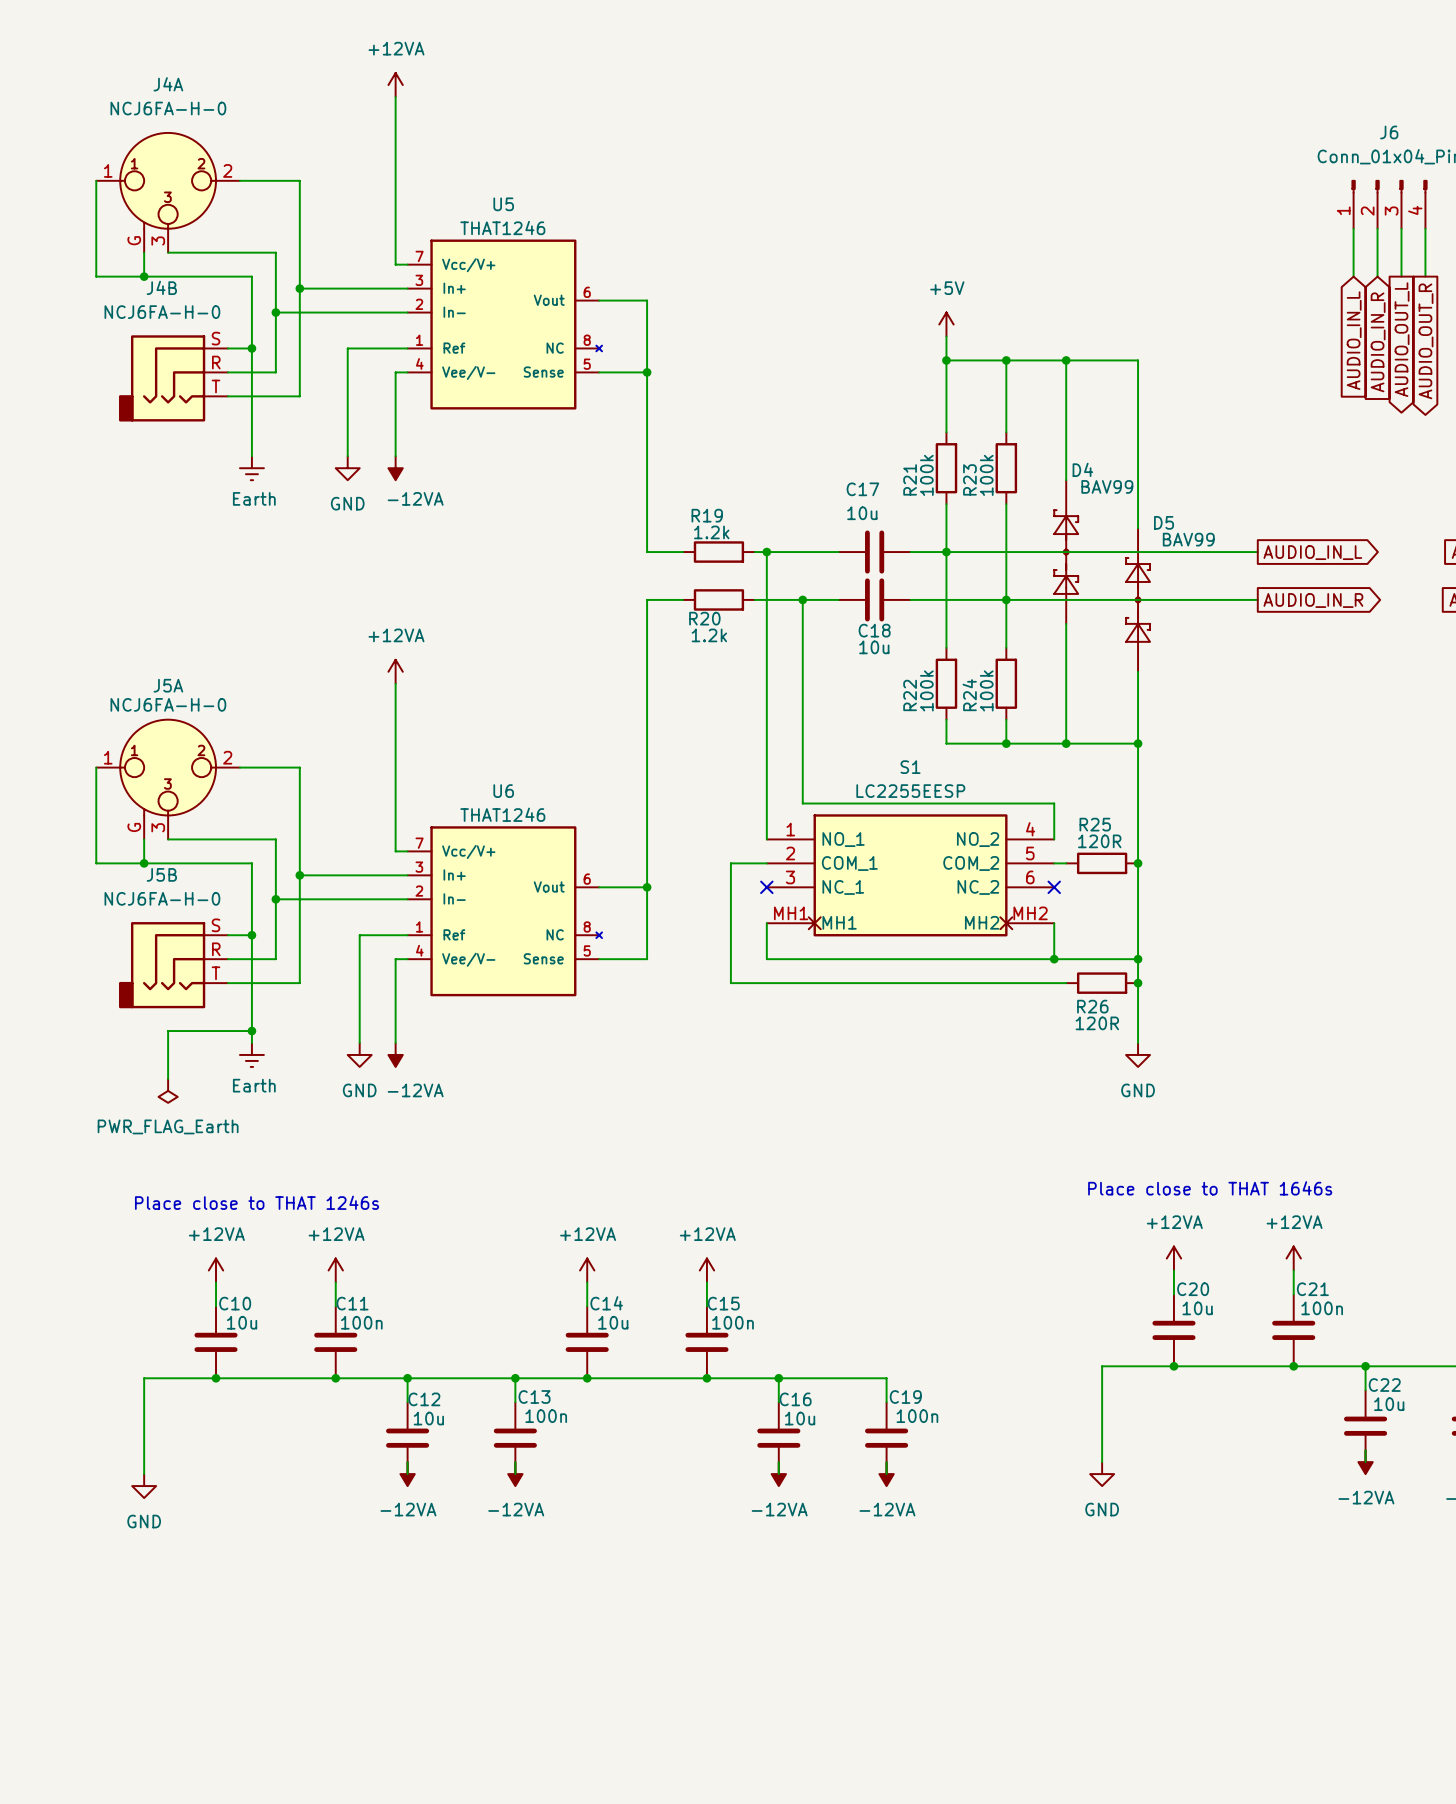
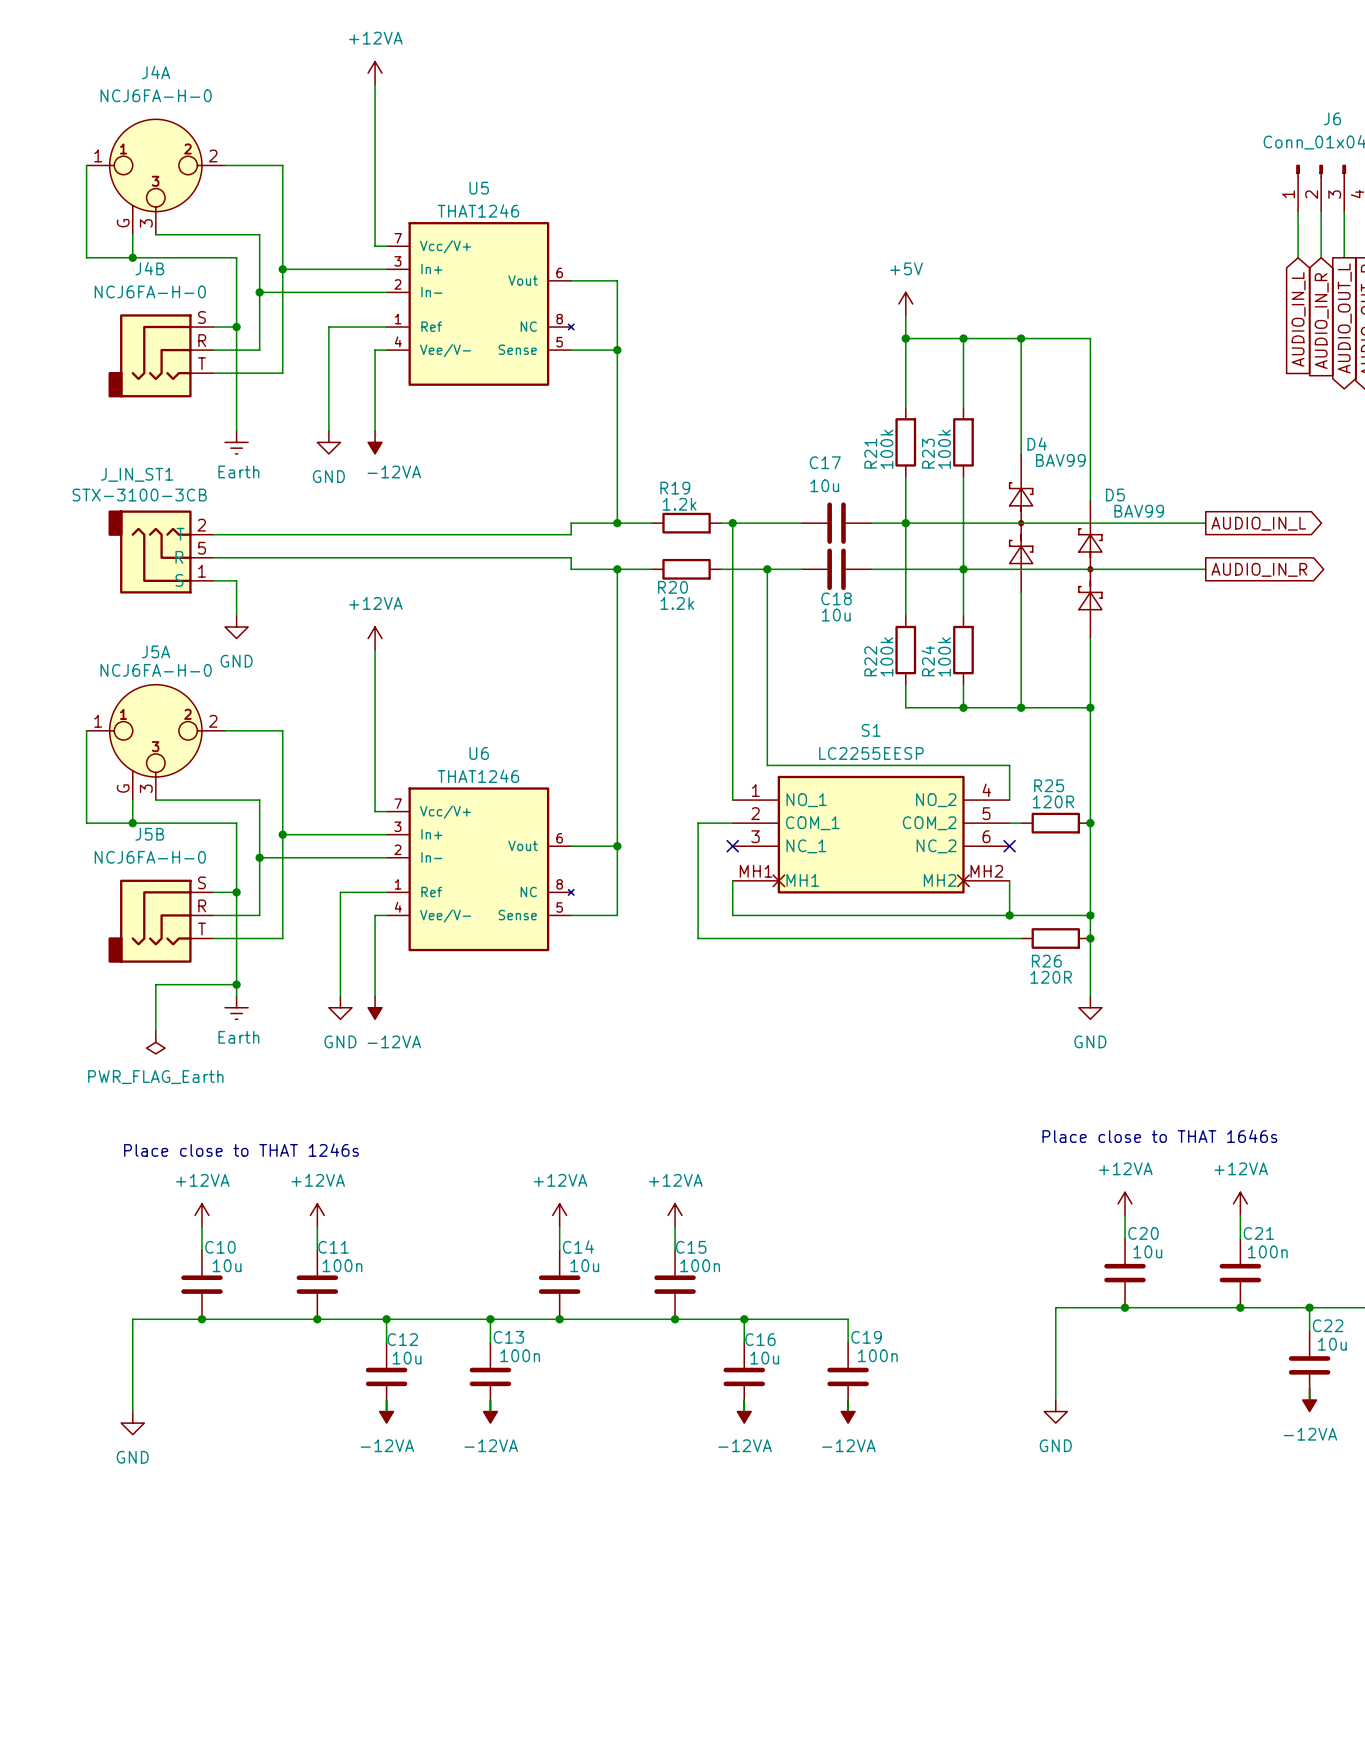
wire: none -> (617, 523) (571, 523) (571, 534) (213, 534)
junction: none -> (617, 523)
J_IN_ST1: none -> STX-3100-3CB (161, 552)
wire: none -> (213, 557) (571, 557) (571, 569) (617, 569)
junction: none -> (617, 569)
wire: none -> (213, 580) (236, 580) (236, 615)
power symbol: none -> GND (236, 626)

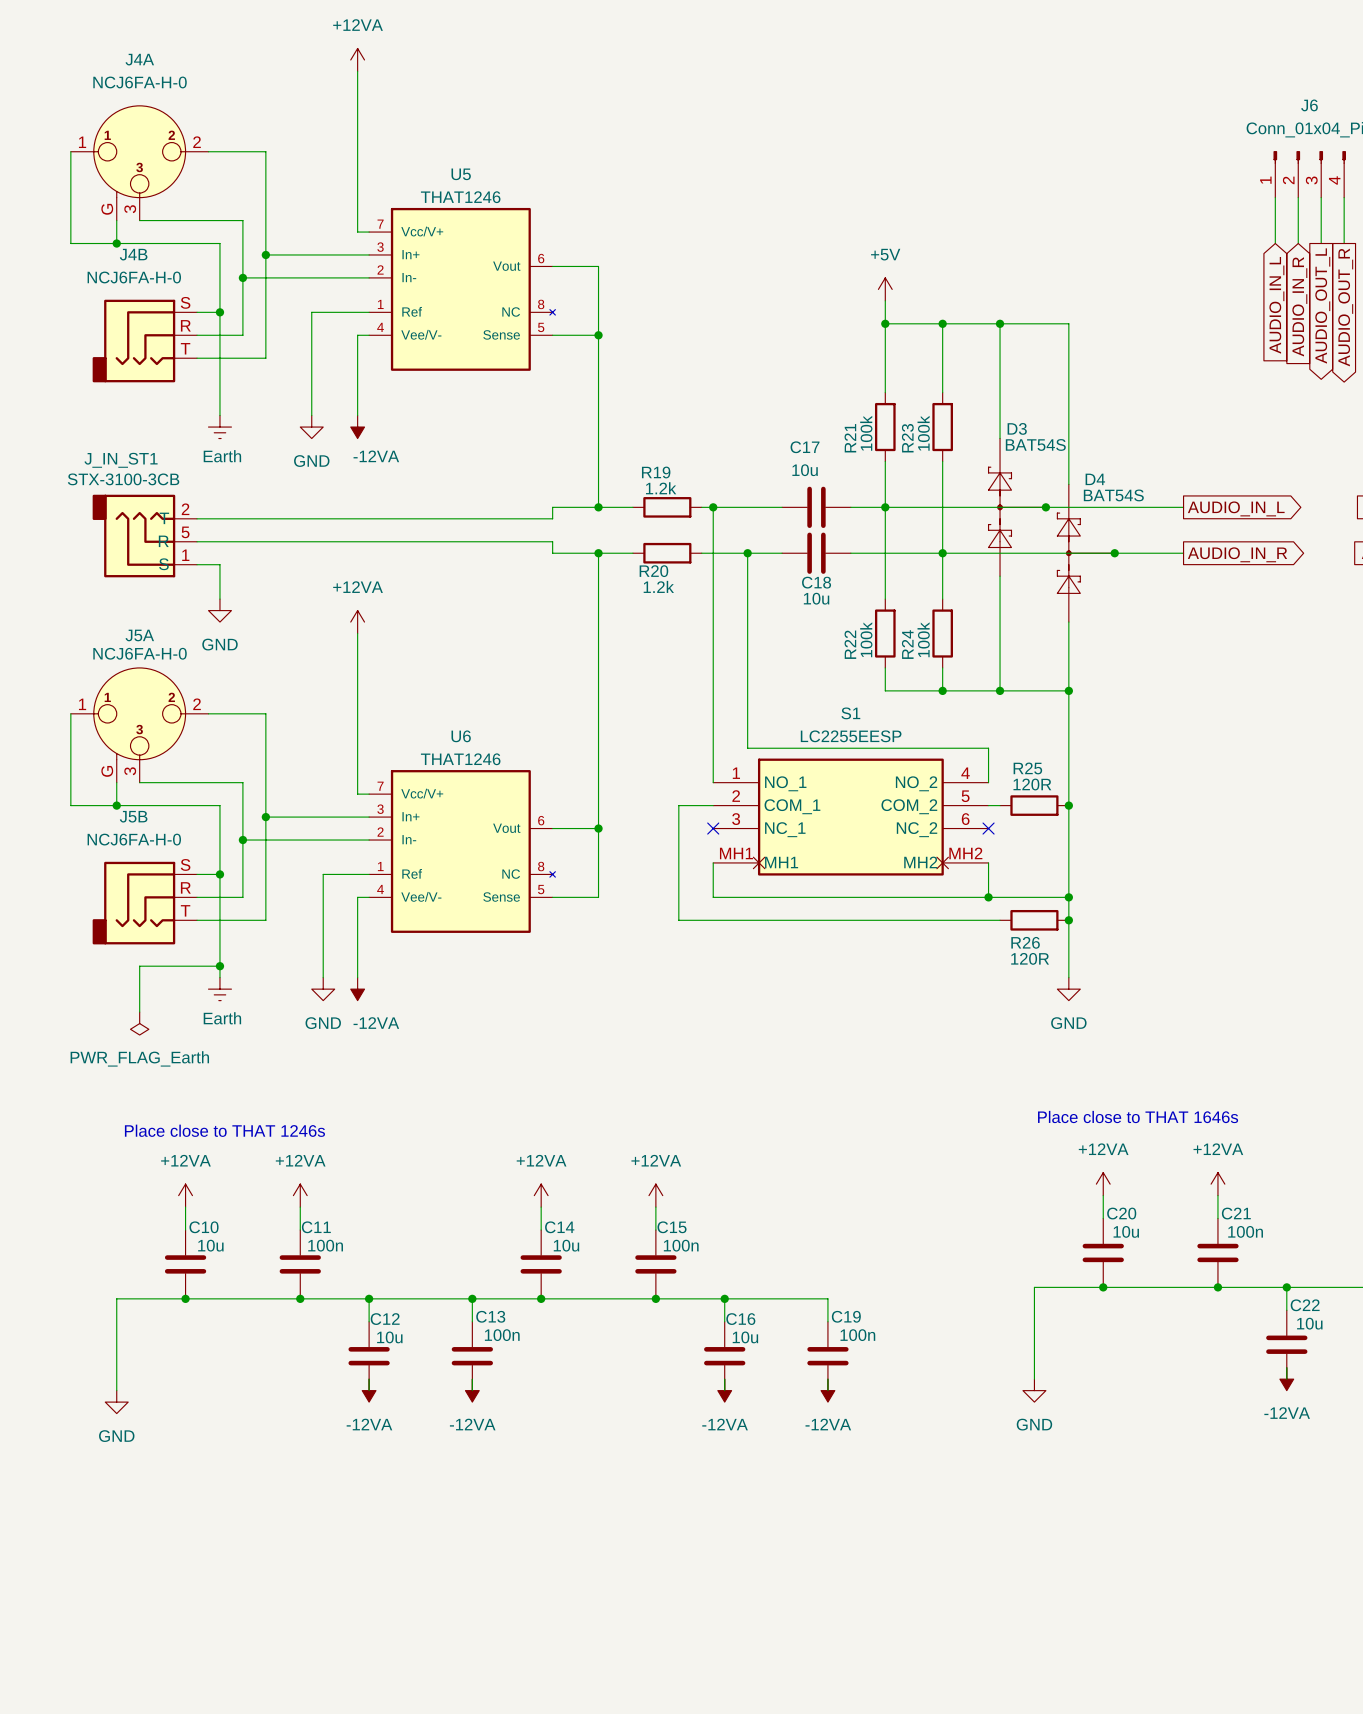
D4 symbol: [1009, 453, 1033, 593] -> [1057, 484, 1115, 623]
D4 value: BAV99 (1060, 460) -> BAT54S (1113, 495)
D3: none -> BAT54S (1017, 507)
junction: none -> (1045, 507)
D5: BAV99 (1090, 569) -> none
junction: none -> (1114, 553)

